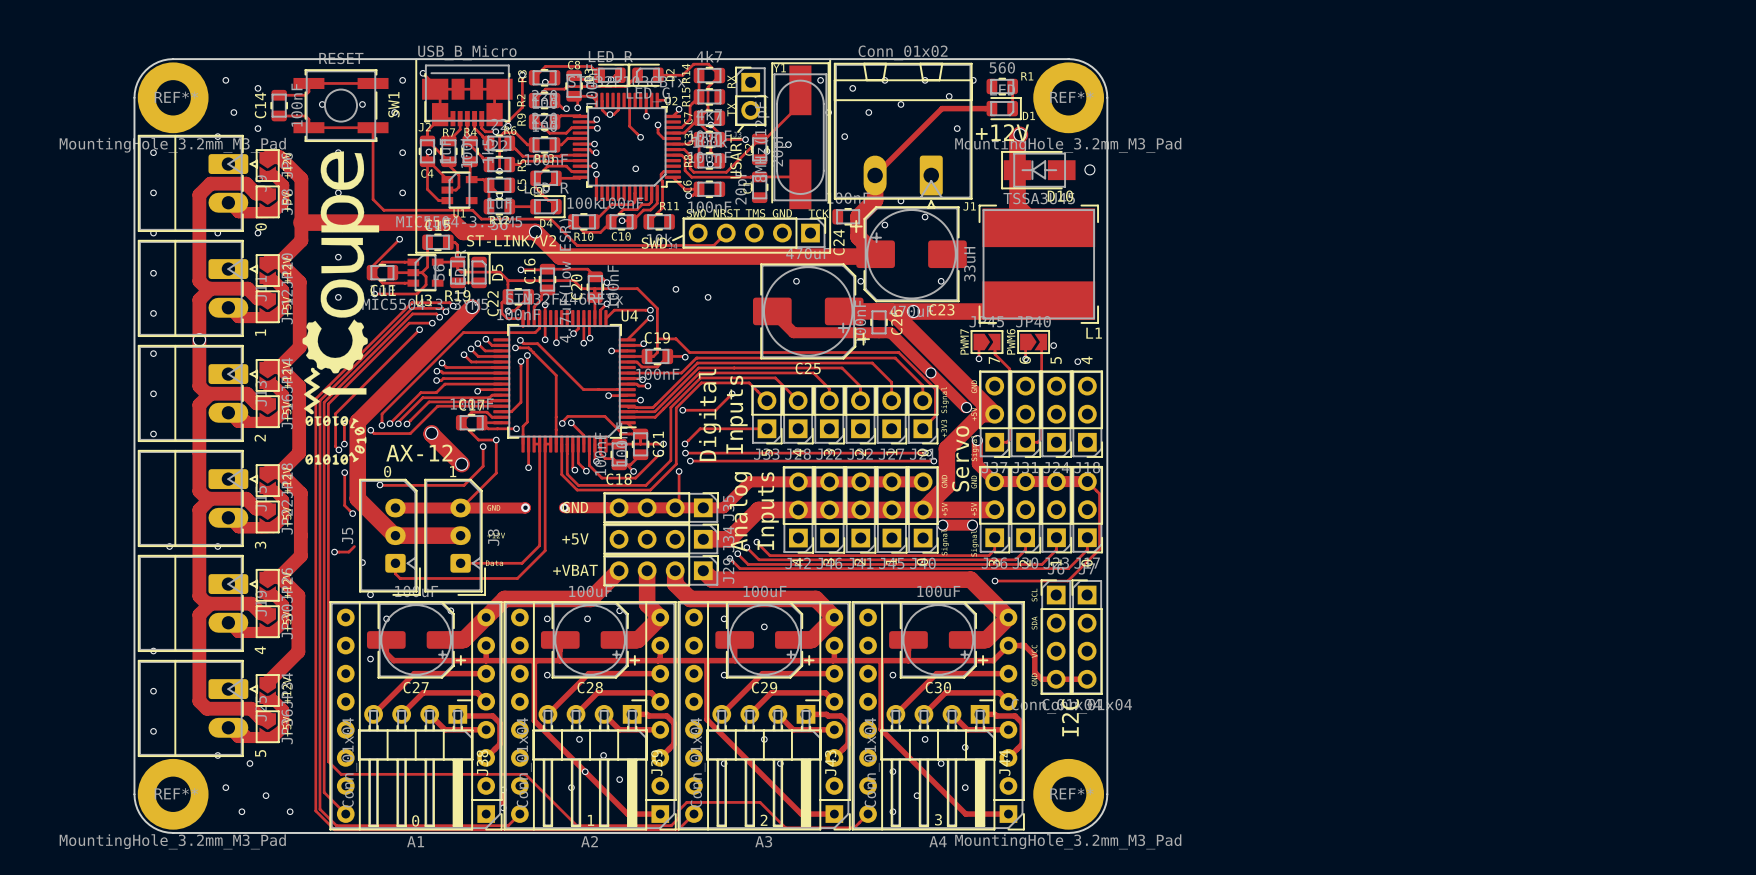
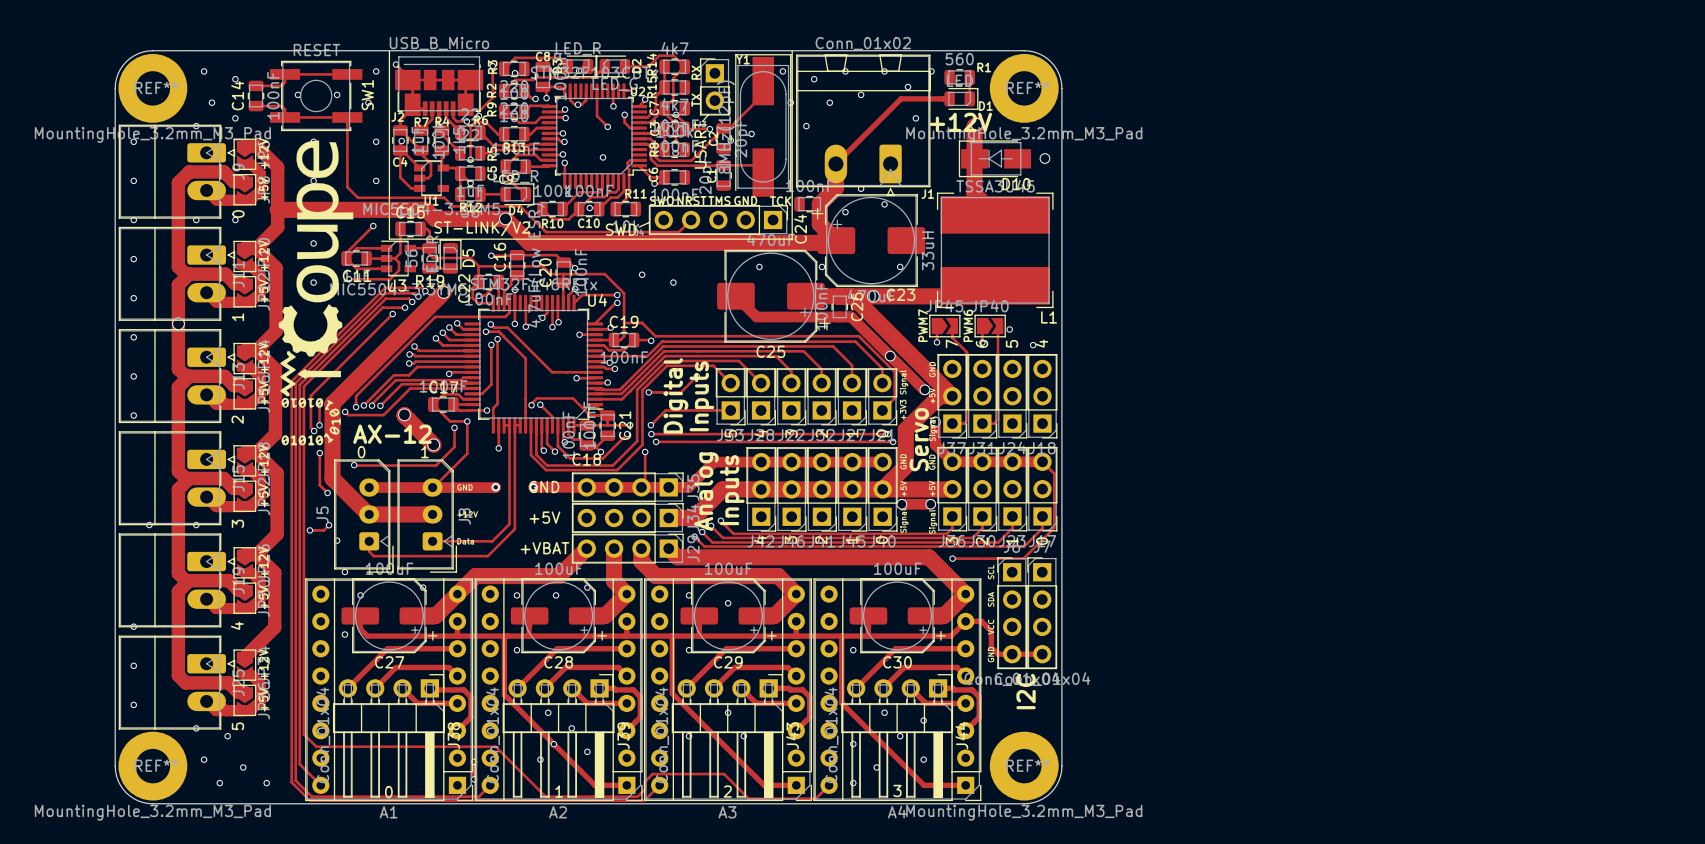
via: none -> (329, 525)

